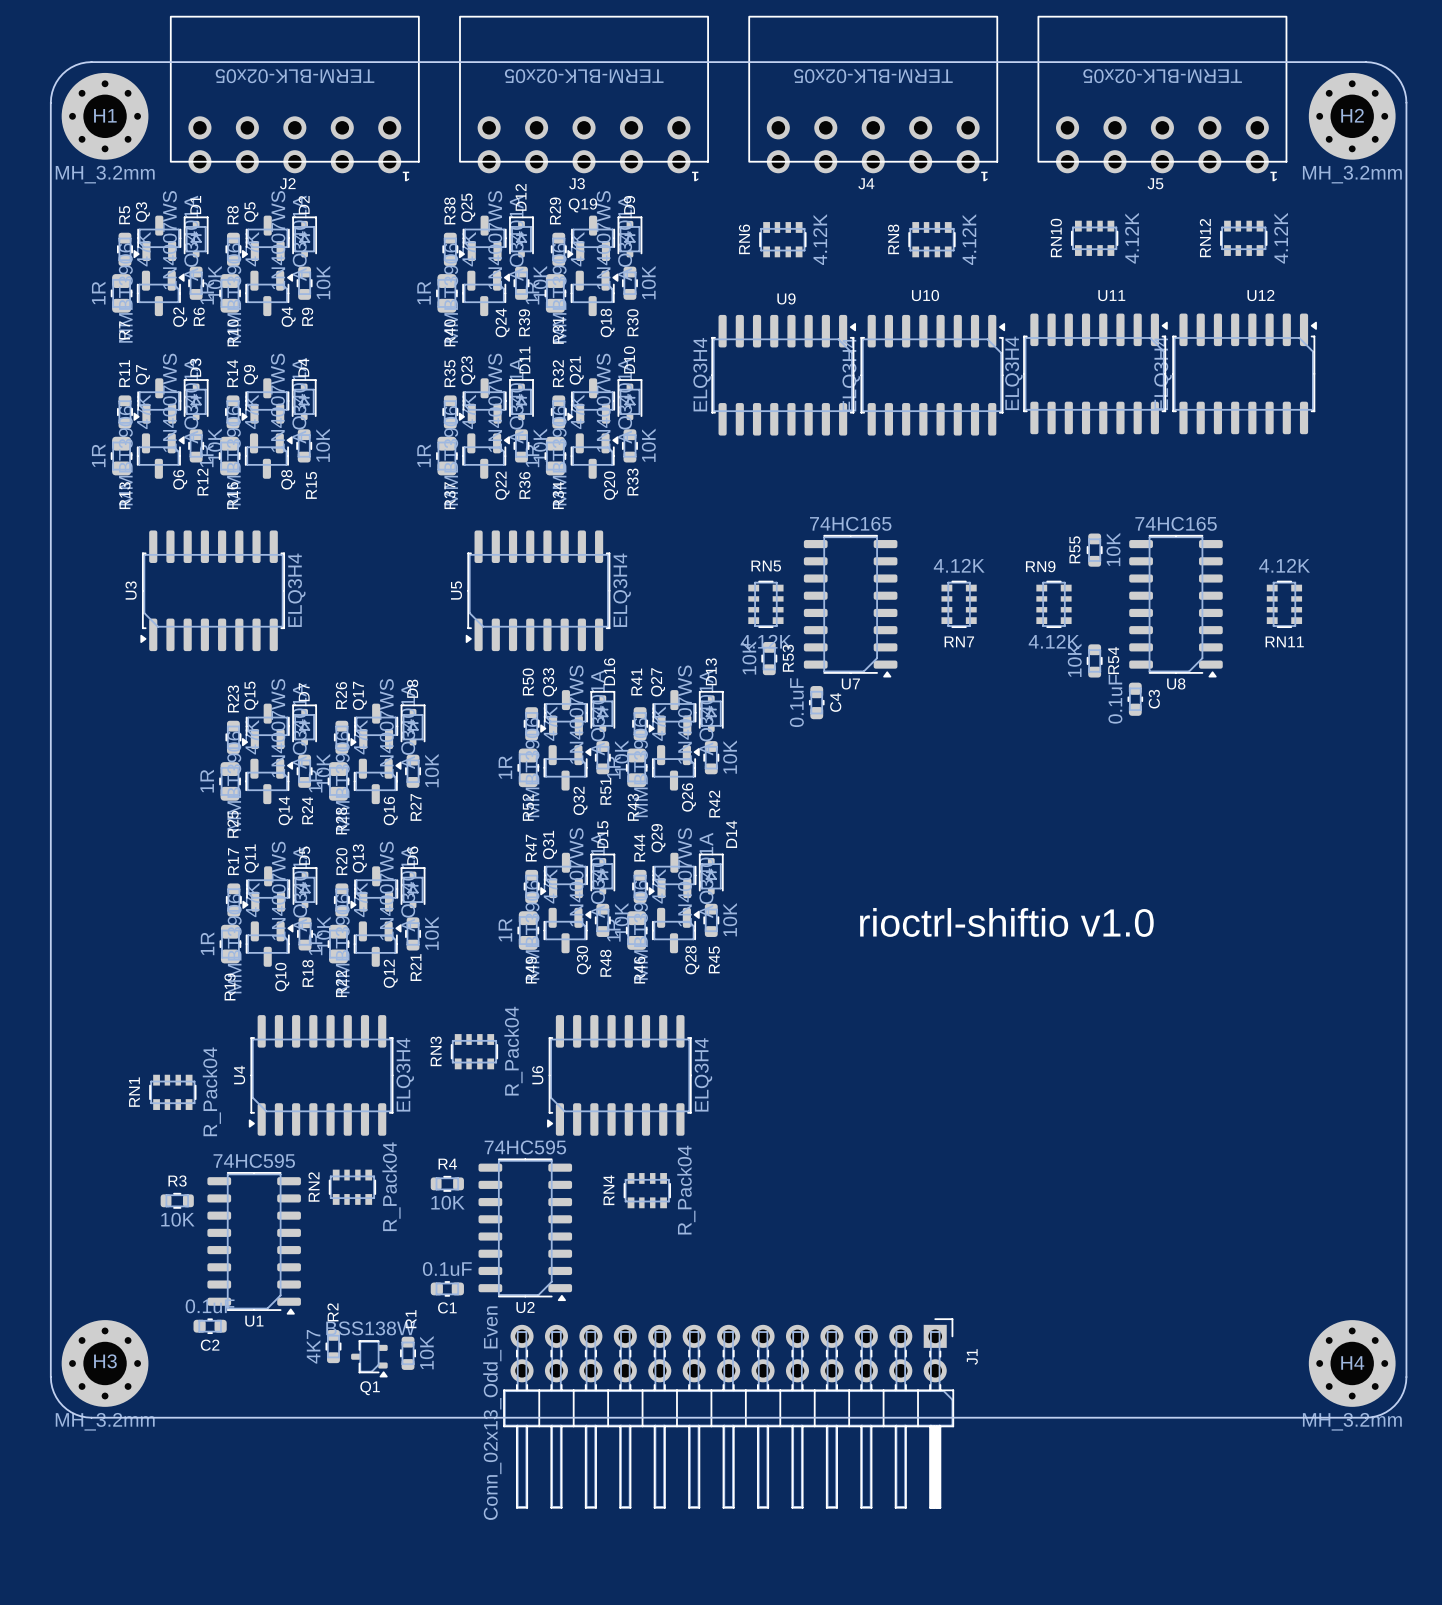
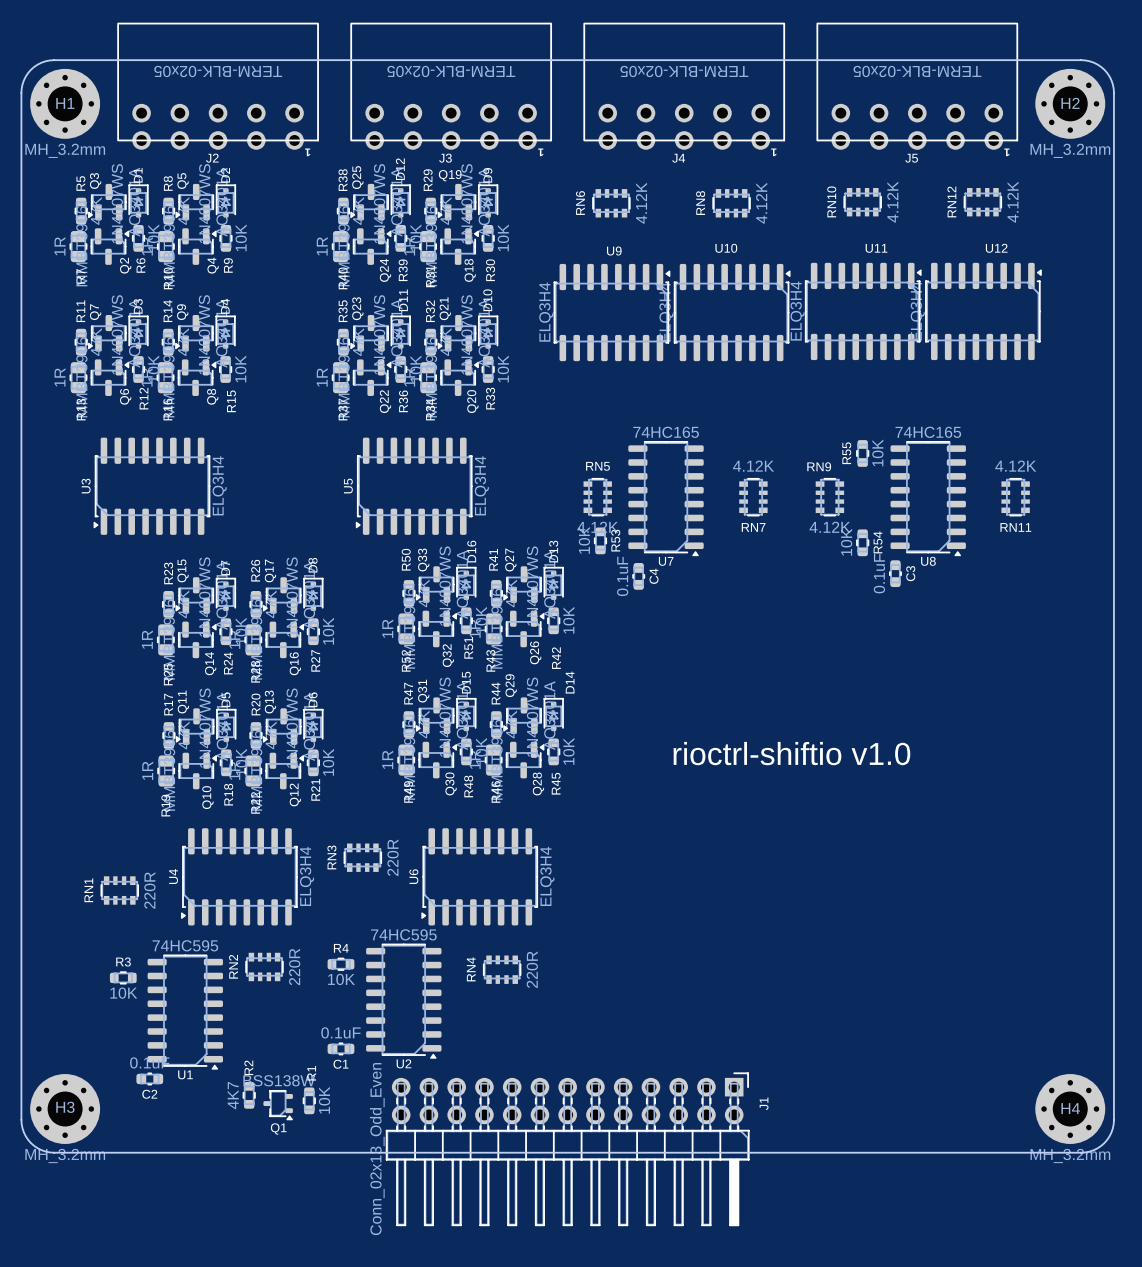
RN3 value: R_Pack04 (513, 1051) -> 220R (393, 857)
RN1 value: R_Pack04 (211, 1091) -> 220R (149, 890)
RN2 value: R_Pack04 (391, 1186) -> 220R (294, 966)
RN4 value: R_Pack04 (686, 1190) -> 220R (532, 969)

